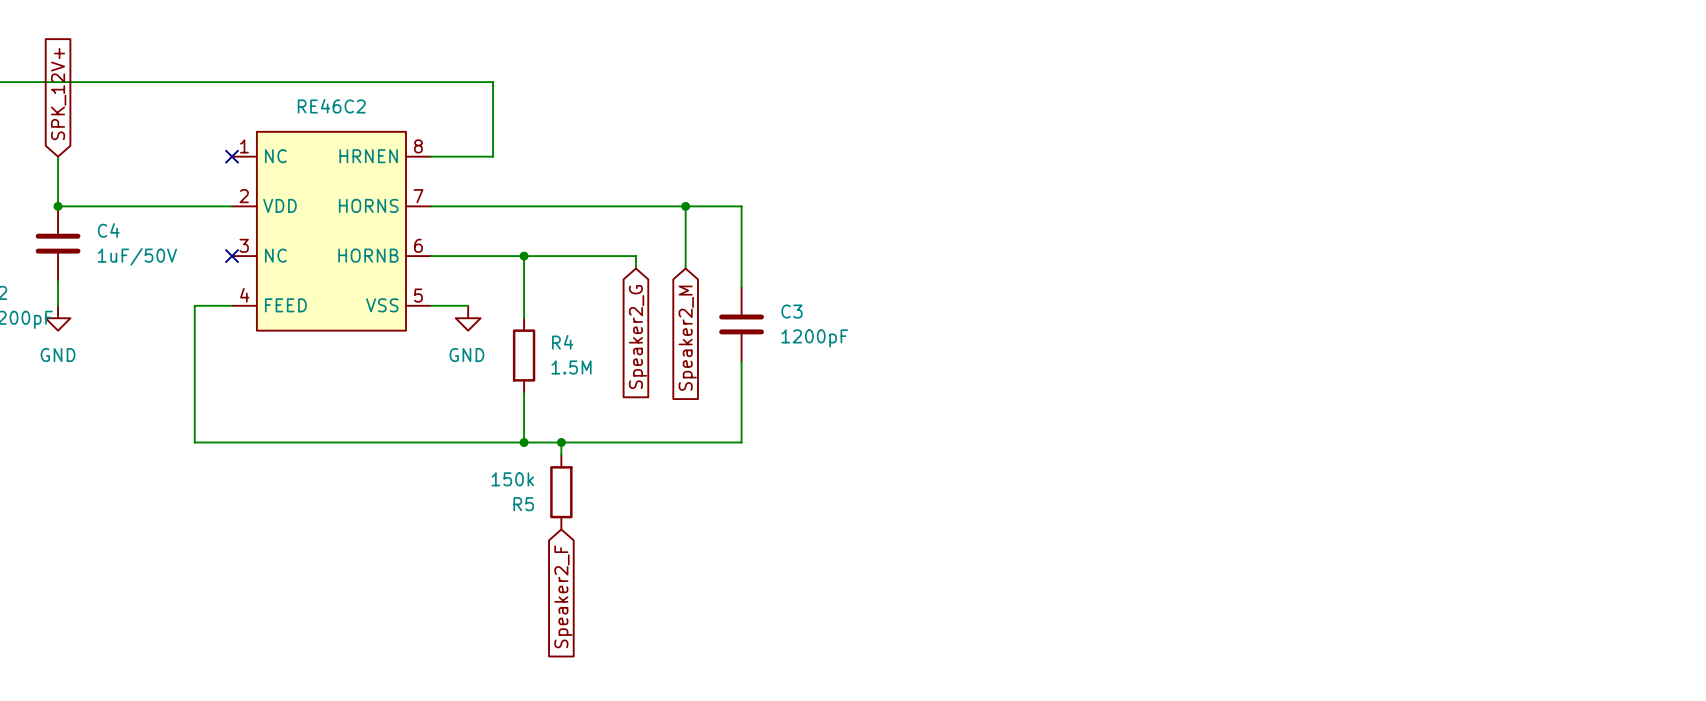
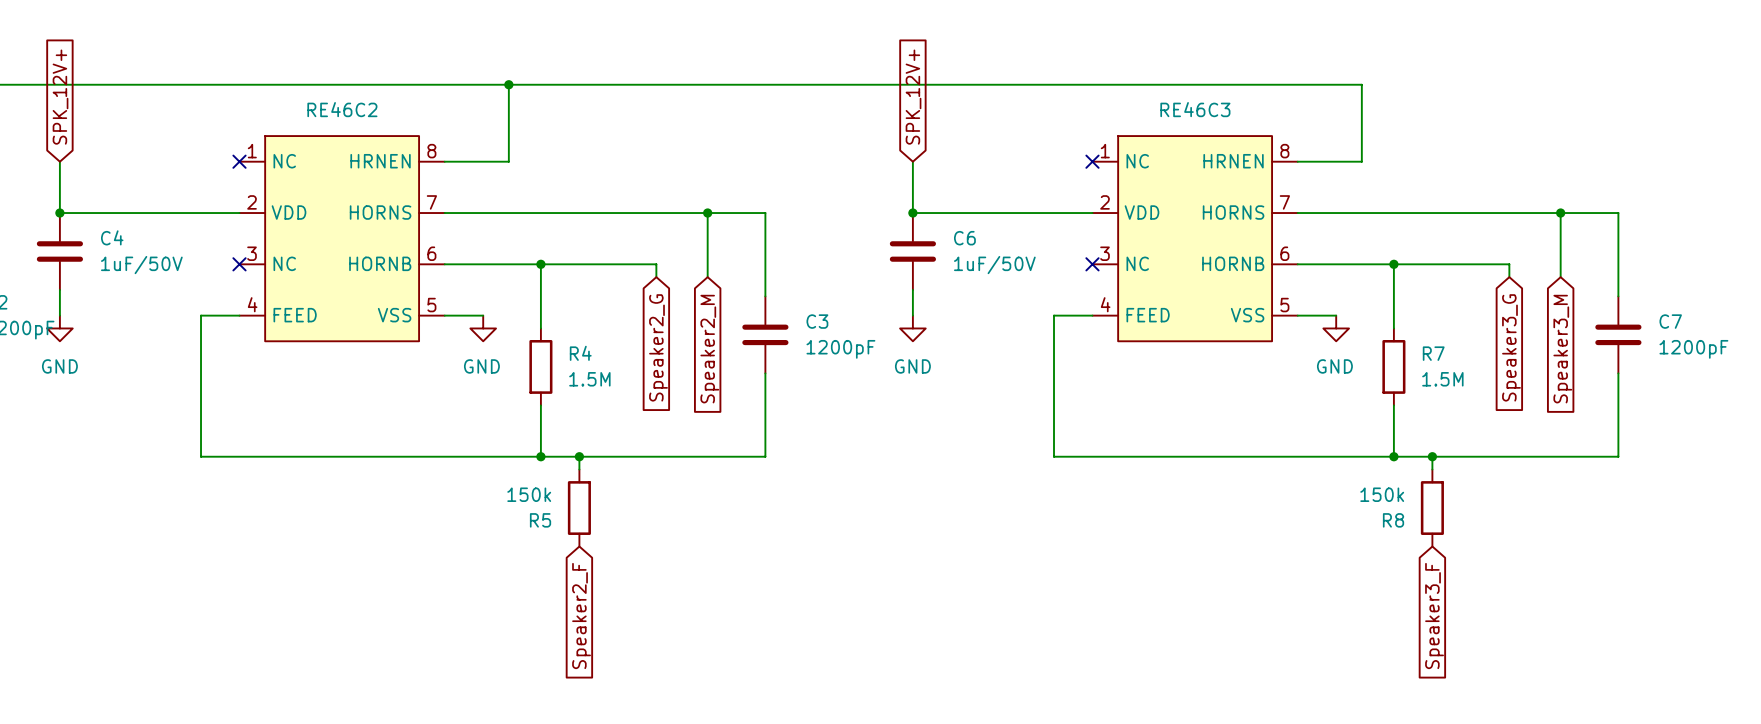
wire: none -> (508, 84) (1361, 84) (1361, 161) (1297, 161)
junction: none -> (508, 84)
global label: none -> SPK_12V+ (913, 97)
wire: none -> (912, 161) (912, 213) (1092, 213)
no-connect mark: none -> (1092, 161)
junction: none -> (912, 213)
wire: none -> (1297, 213) (1618, 213) (1618, 296)
wire: none -> (1560, 213) (1560, 277)
junction: none -> (1560, 213)
RE46C3: none -> (1195, 238)
C6: none -> 1uF/50V (912, 251)
no-connect mark: none -> (1092, 264)
wire: none -> (1297, 264) (1509, 264) (1509, 277)
wire: none -> (1393, 264) (1393, 328)
junction: none -> (1393, 264)
wire: none -> (912, 289) (912, 315)
wire: none -> (1092, 315) (1054, 315) (1054, 456) (1618, 456) (1618, 373)
wire: none -> (1297, 315) (1336, 315)
power symbol: none -> GND (912, 328)
power symbol: none -> GND (1336, 328)
C7: none -> 1200pF (1618, 334)
global label: none -> Speaker3_G (1511, 347)
global label: none -> Speaker3_M (1562, 349)
R7: none -> 1.5M (1393, 366)
wire: none -> (1393, 405) (1393, 456)
junction: none -> (1393, 456)
wire: none -> (1432, 456) (1432, 469)
junction: none -> (1432, 456)
R8: none -> 150k (1432, 508)
global label: none -> Speaker3_F (1434, 616)

